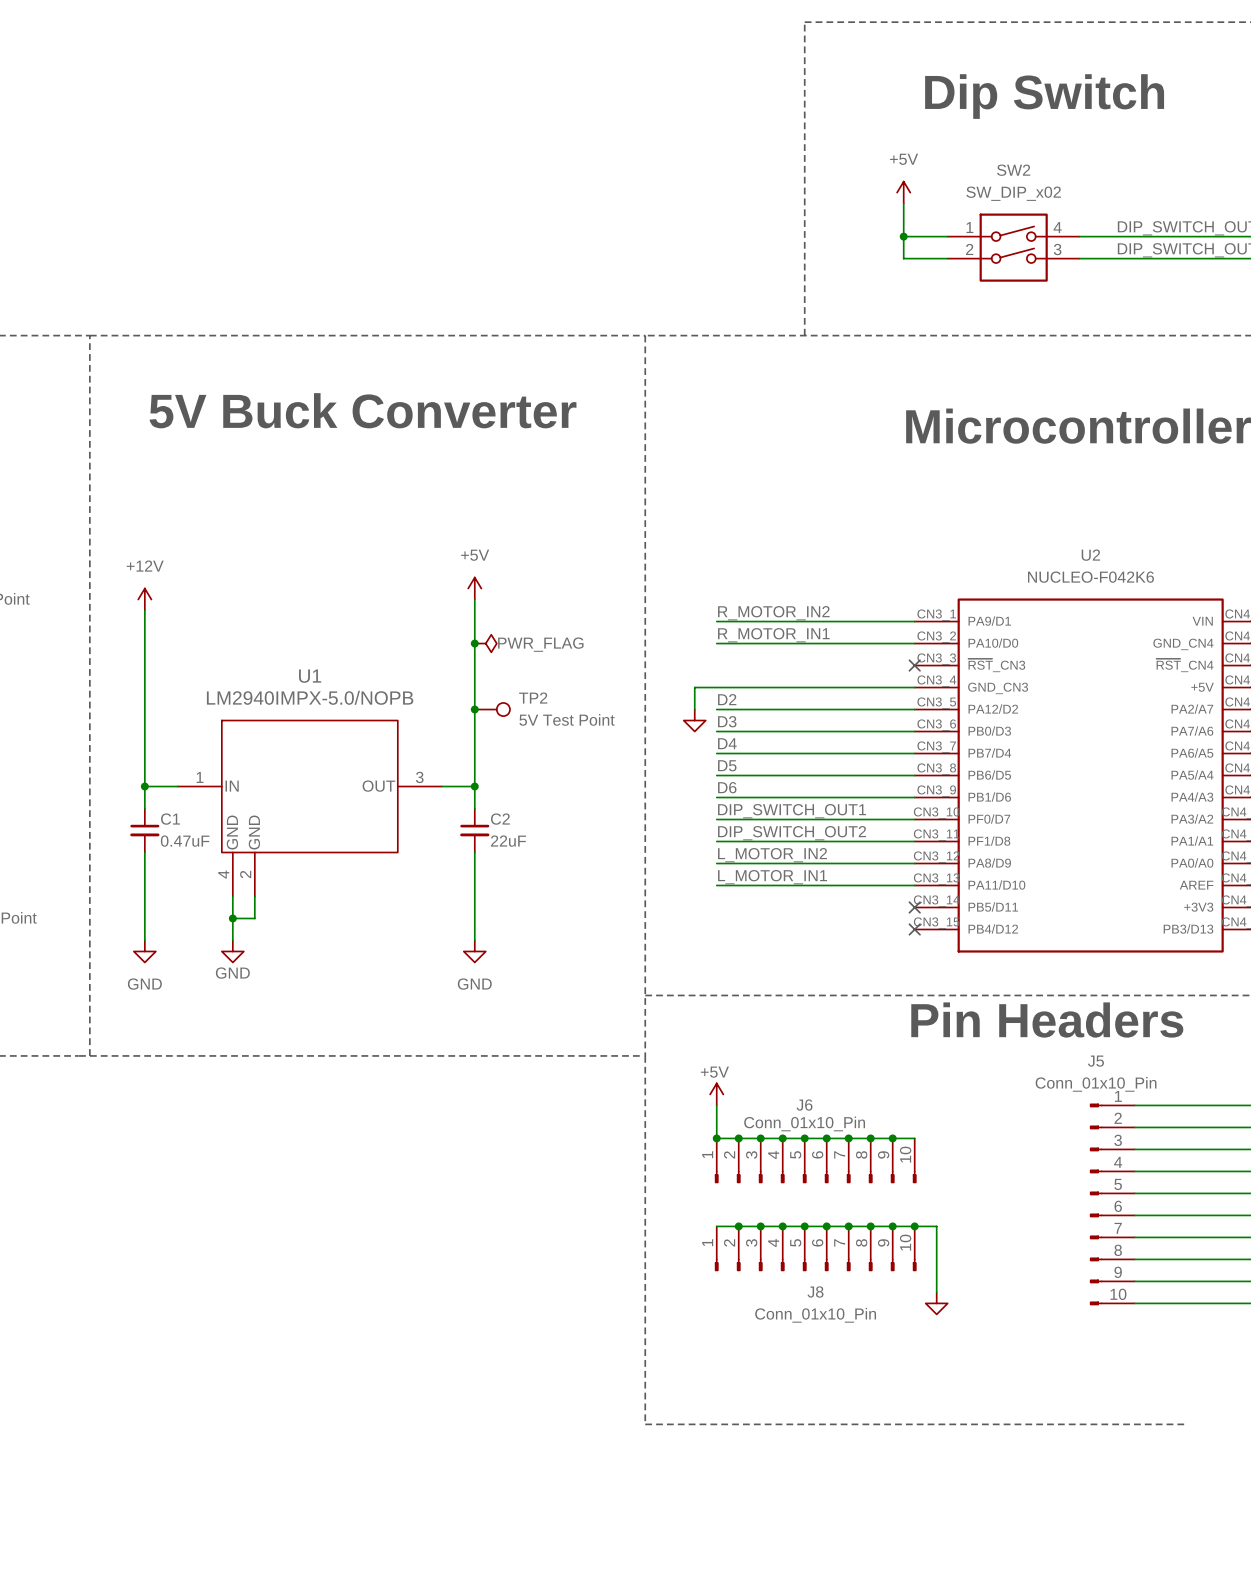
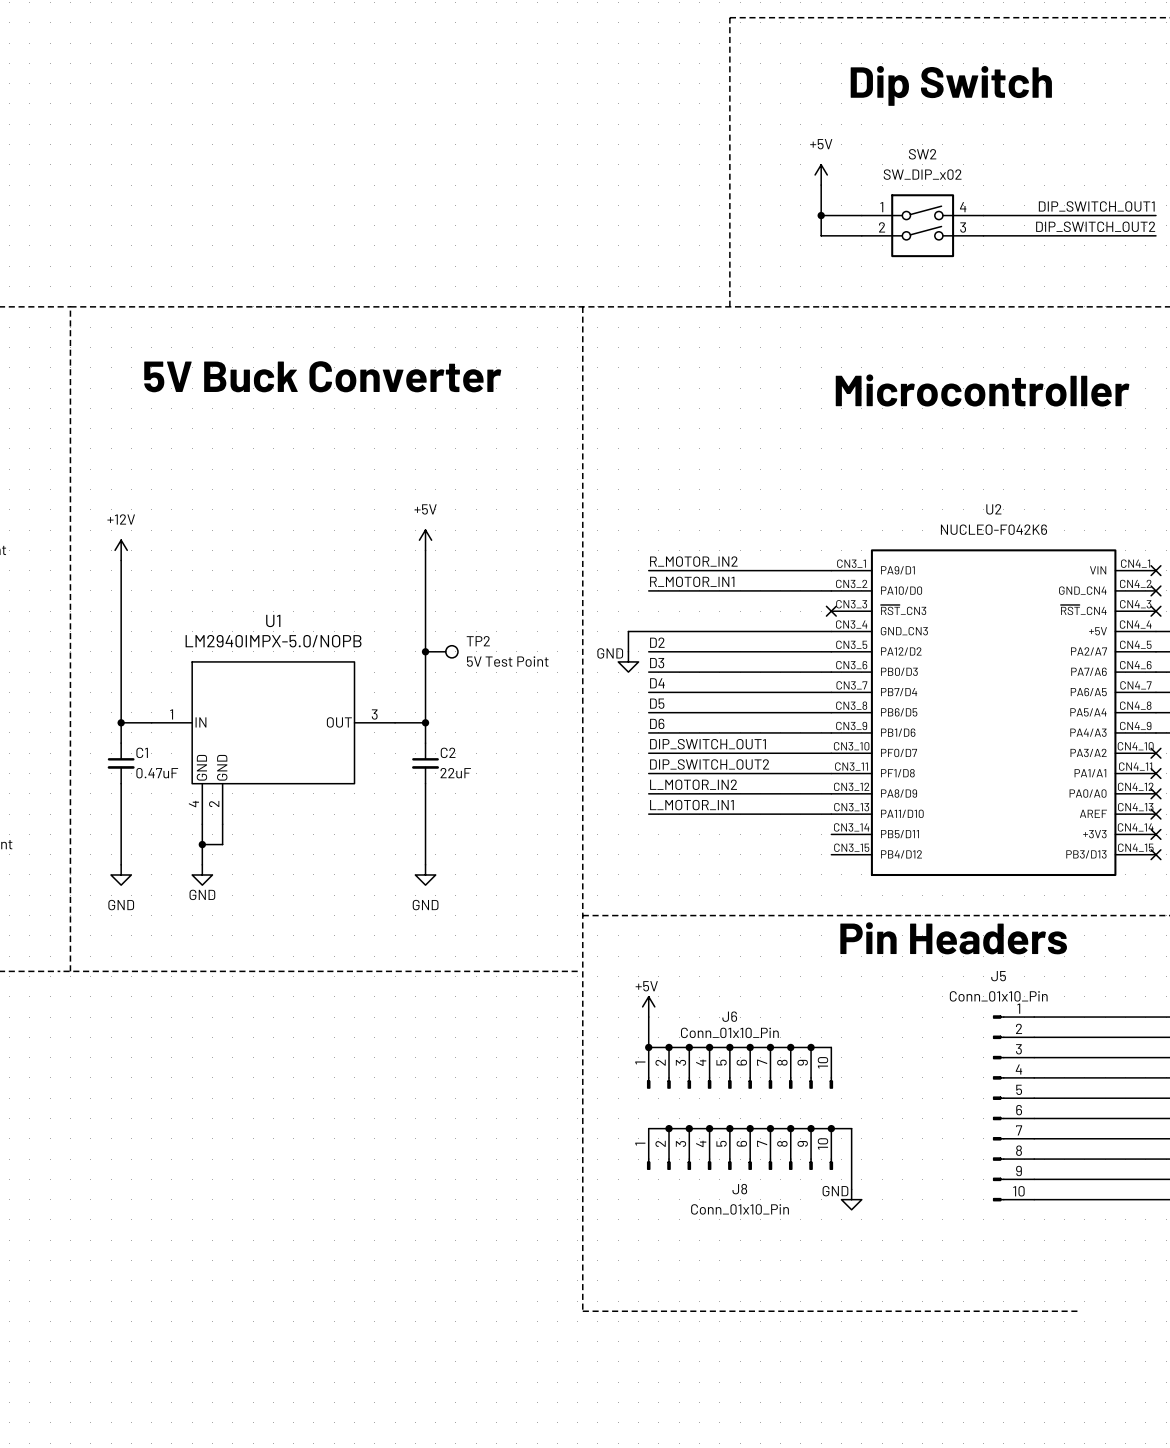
junction: (474, 643) -> none
power symbol: PWR_FLAG (485, 643) -> none
power symbol text: none -> GND (610, 653)
no-connect mark: (914, 907) -> none
no-connect mark: (914, 929) -> none
power symbol text: none -> GND (835, 1191)

